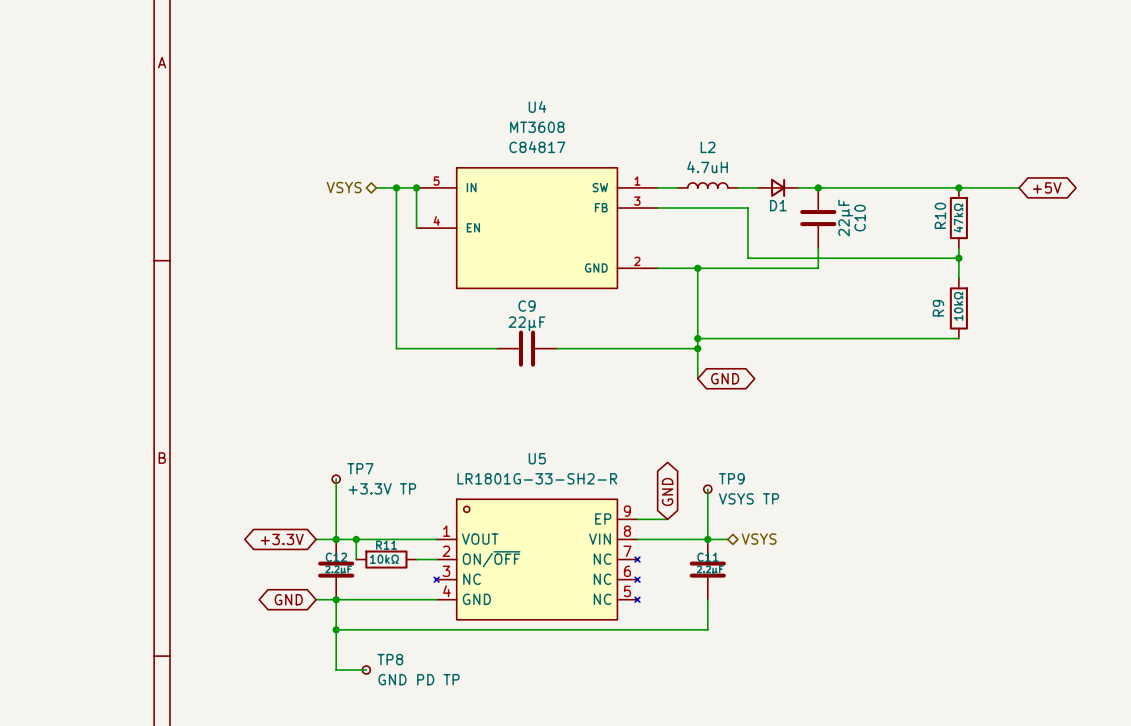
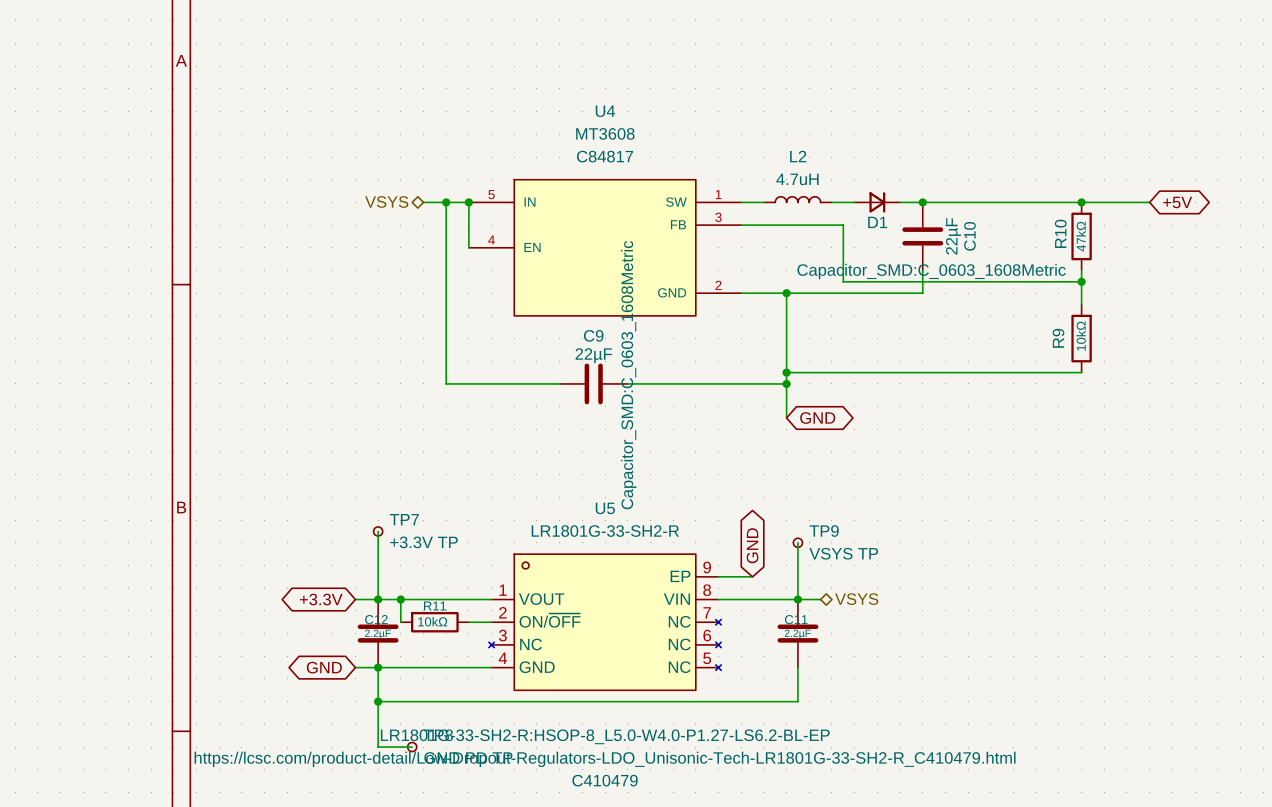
C10 text: none -> Capacitor_SMD:C_0603_1608Metric (931, 271)
C9 text: none -> Capacitor_SMD:C_0603_1608Metric (628, 375)
U5 text: none -> LR1801G-33-SH2-R:HSOP-8_L5.0-W4.0-P1.27-LS6.2-BL-EP (605, 736)
U5 text: none -> https://lcsc.com/product-detail/Low-Dropout-Regulators-LDO_Unisonic-Tech-LR1801G-33-SH2-R_C410479.html (605, 759)
U5 text: none -> C410479 (605, 780)

